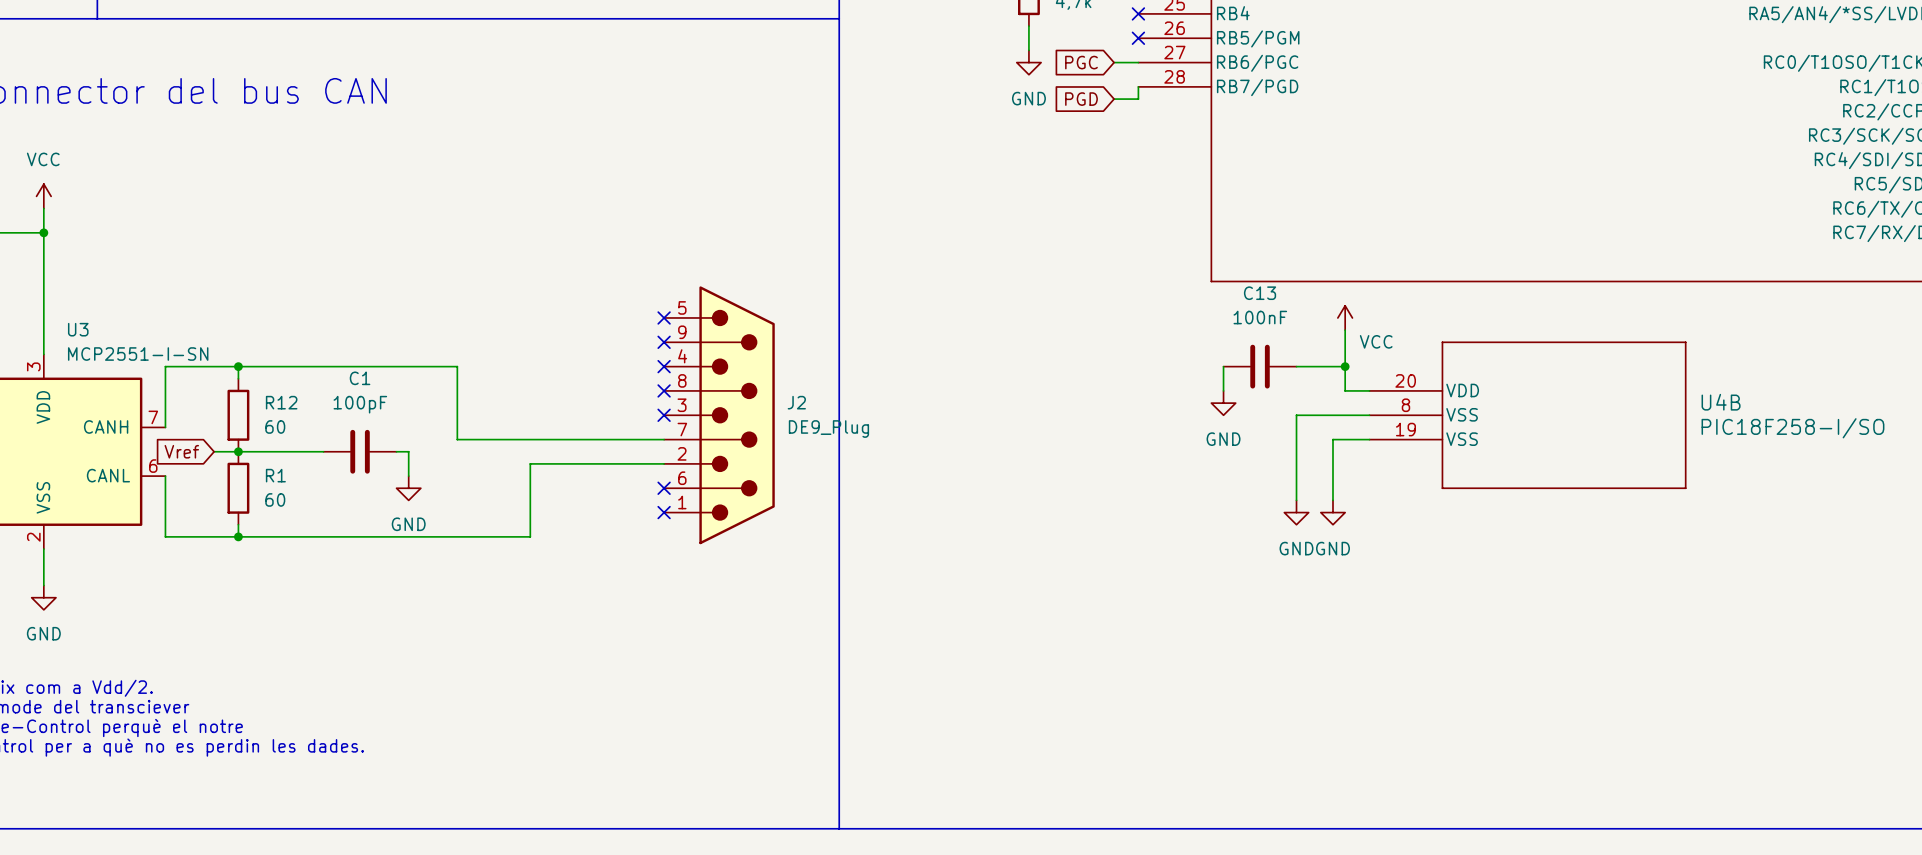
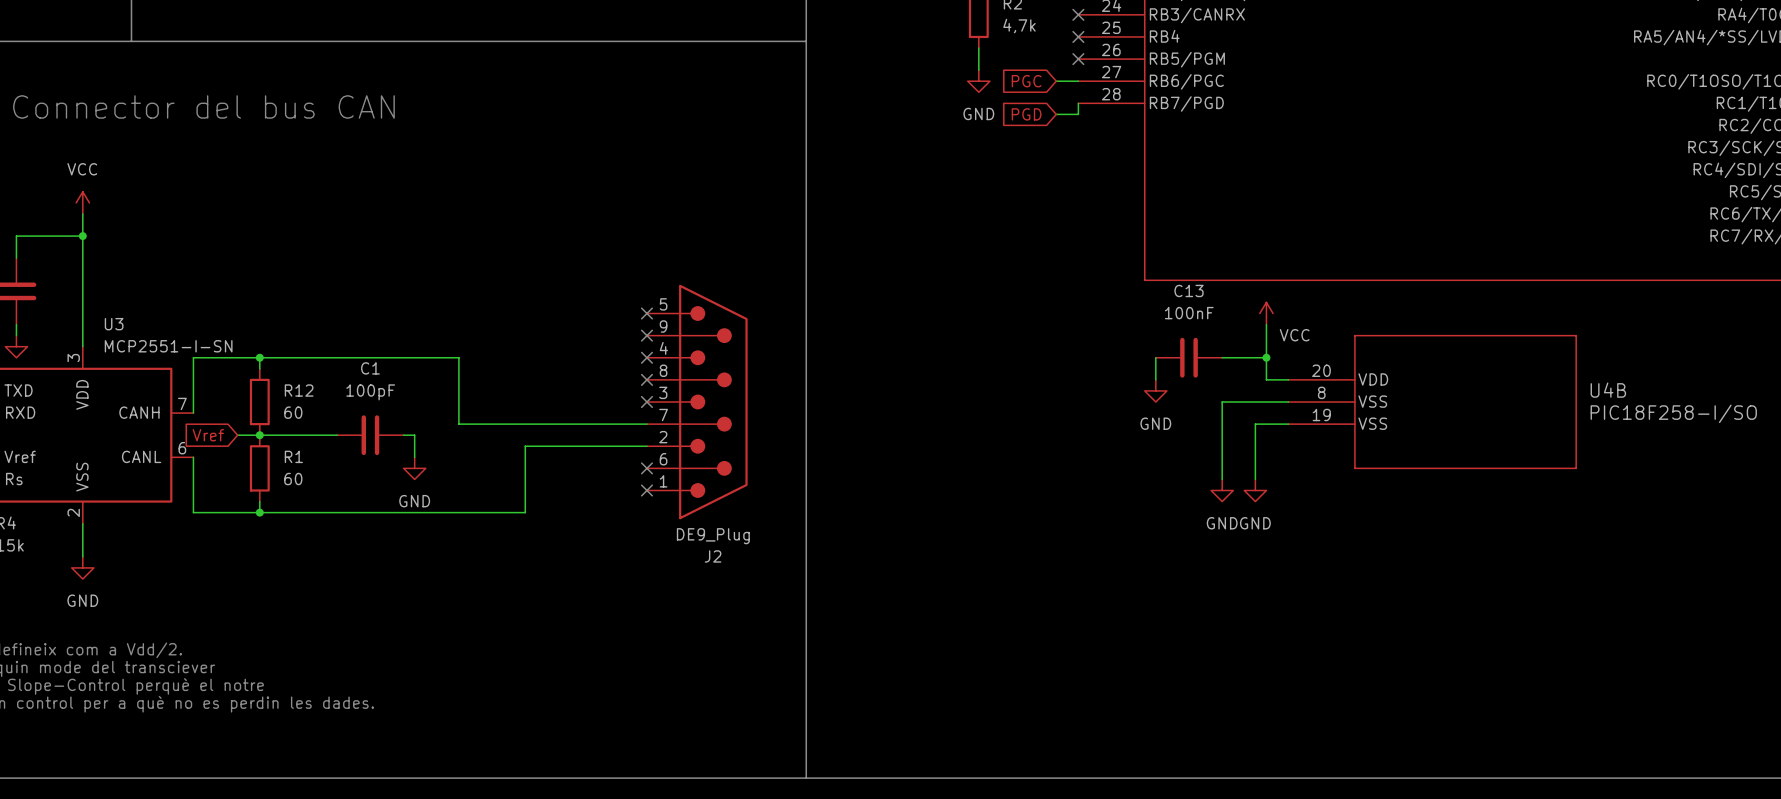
J2 name position: J2 (796, 402) -> J2 (713, 556)
J2 value position: DE9_Plug (828, 429) -> DE9_Plug (713, 536)

